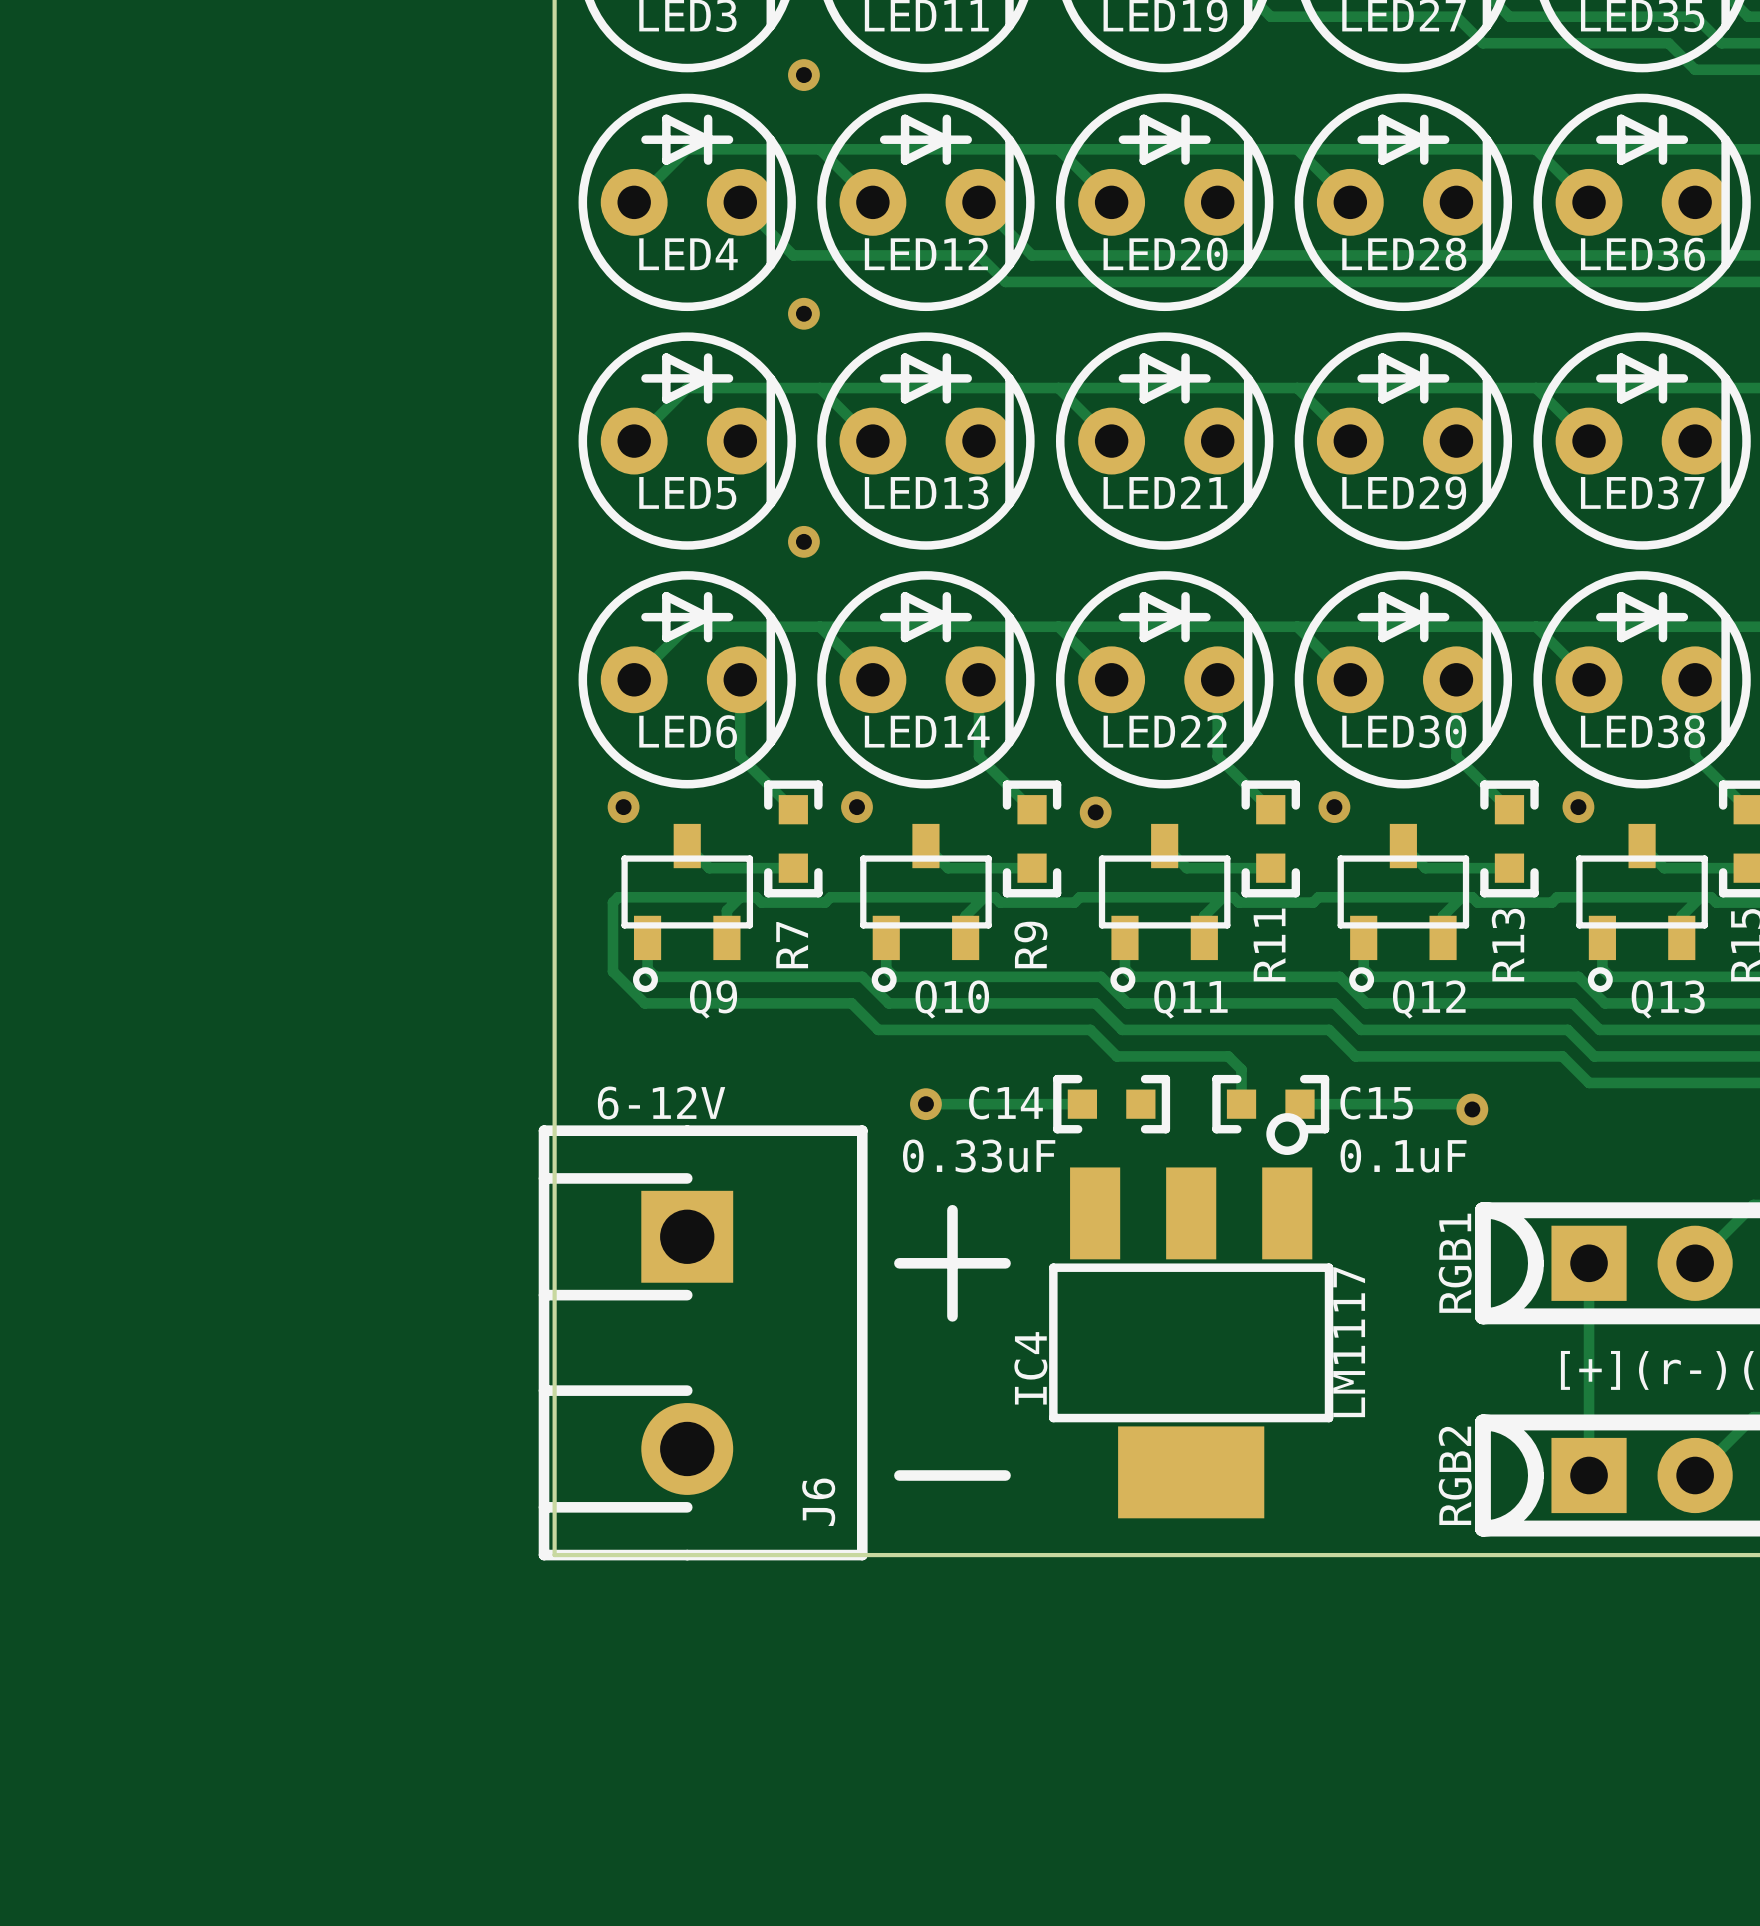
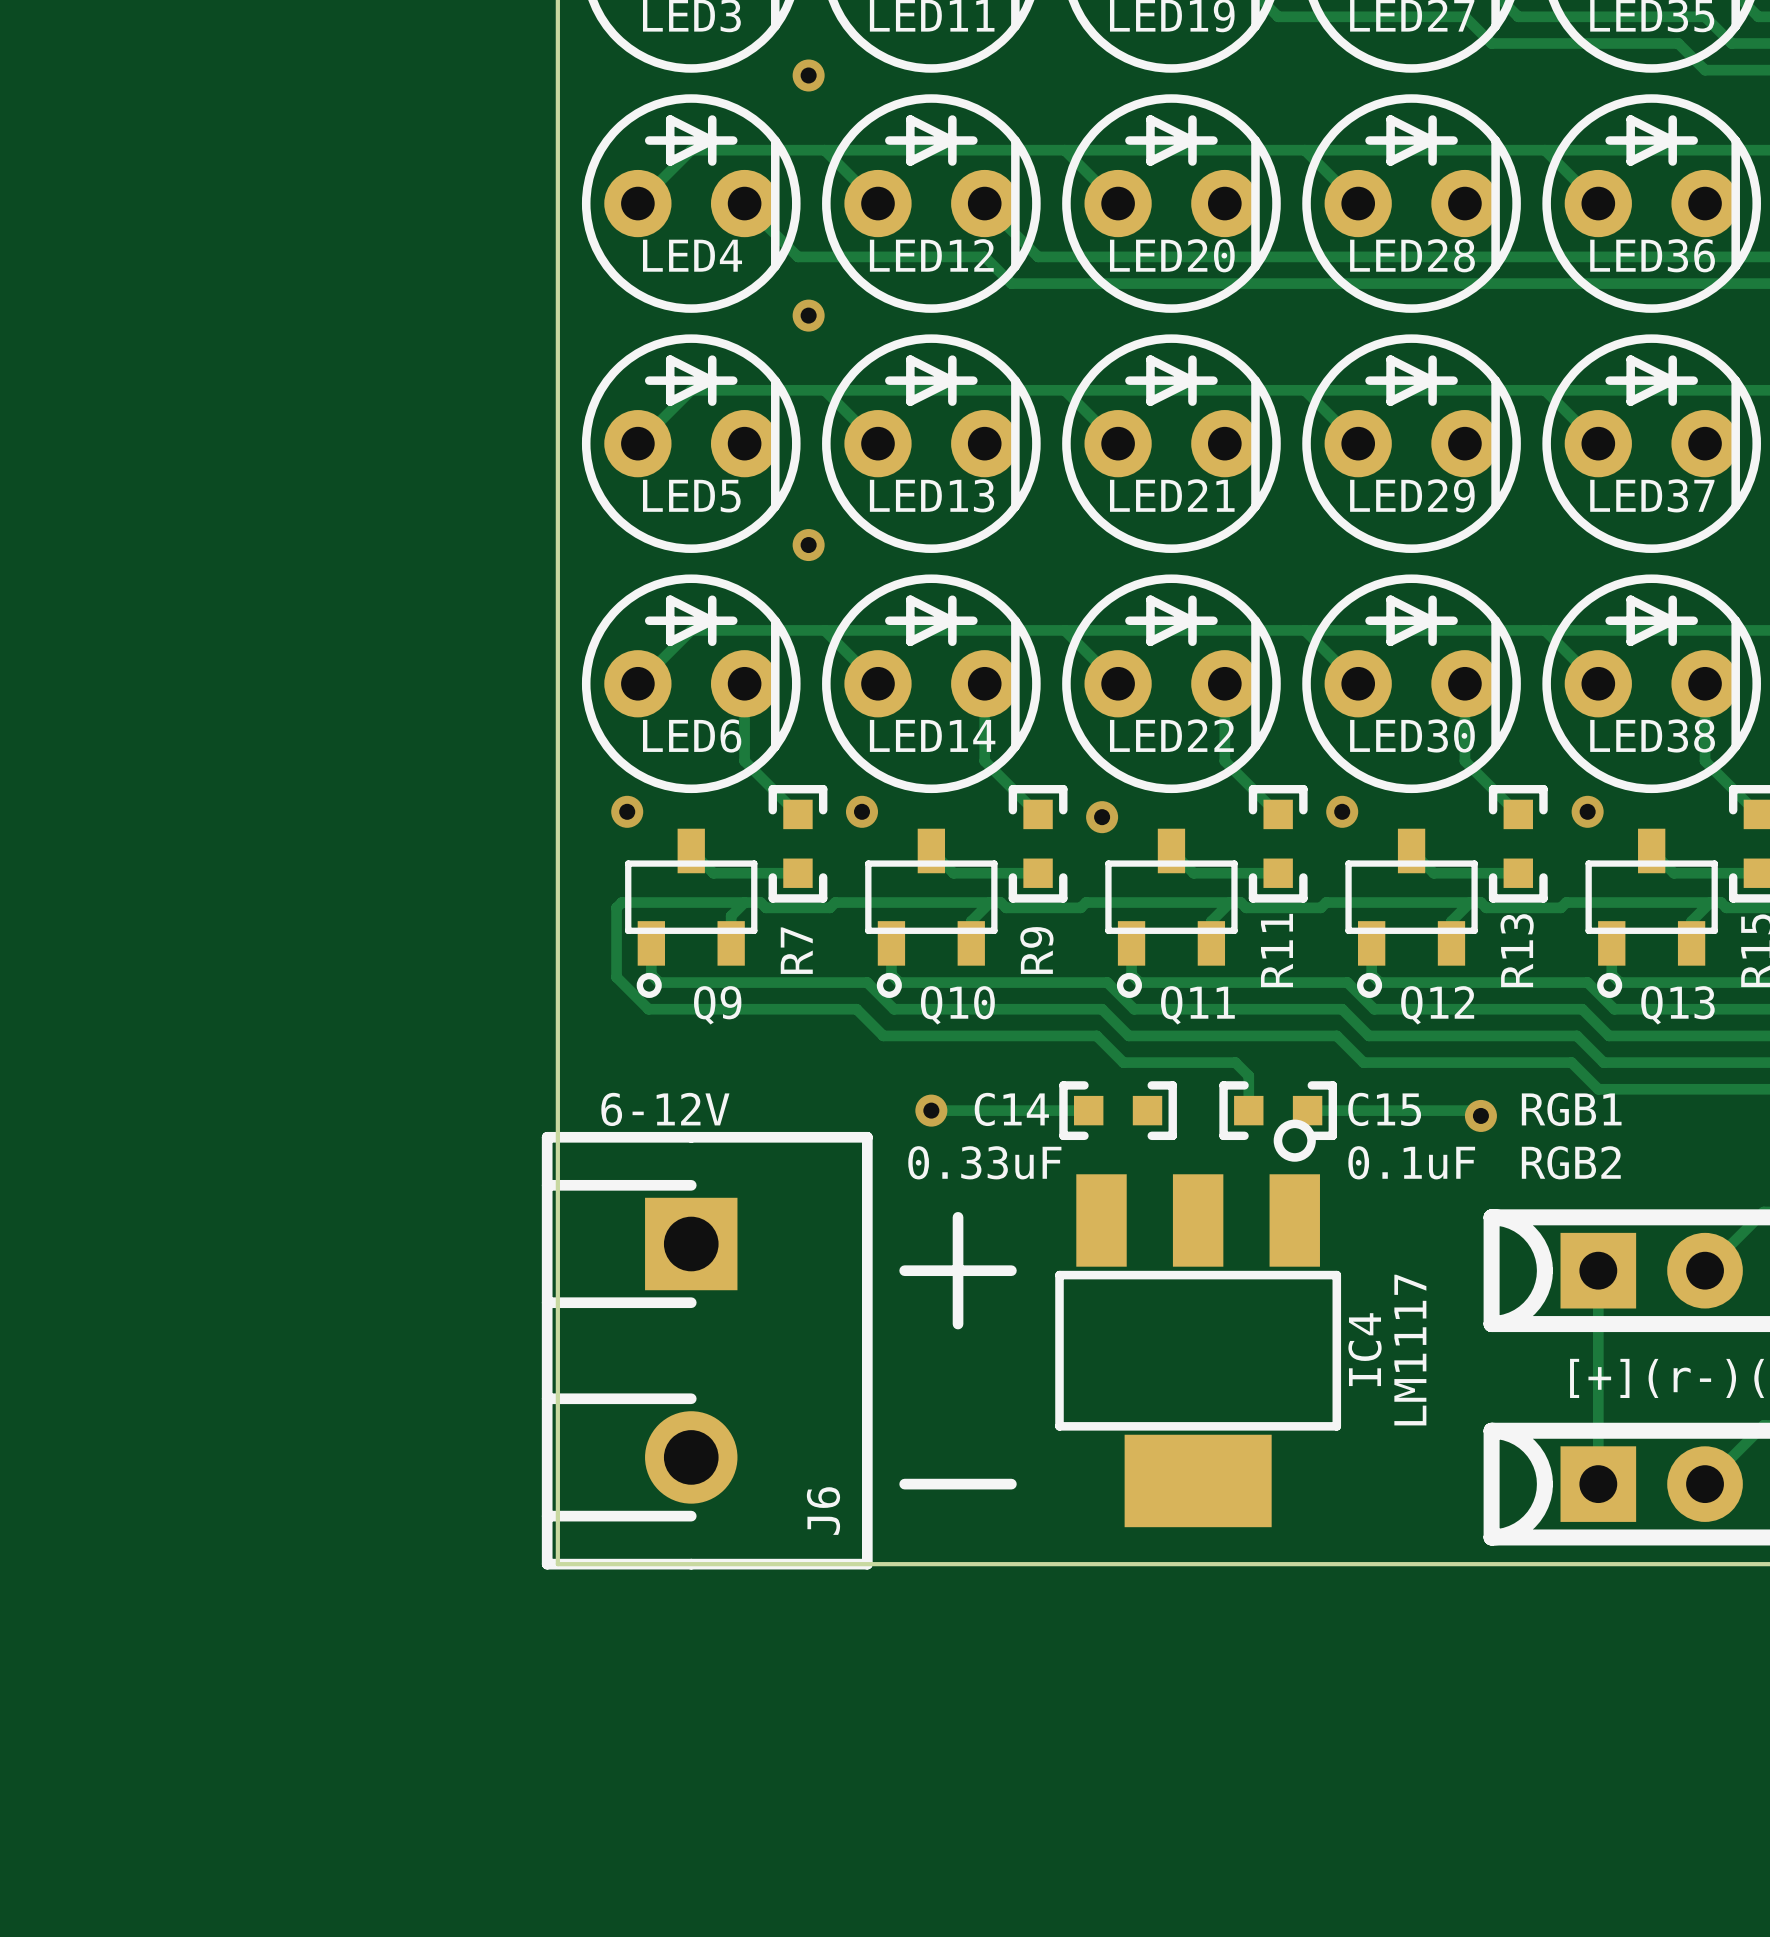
part value rotation: 0° (1455, 1263) -> 90° clockwise (1571, 1109)
part value position: RGB1 (1455, 1263) -> RGB1 (1571, 1109)
IC4 value position: LM1117 (1349, 1342) -> LM1117 (1410, 1350)
IC4 name position: IC4 (1030, 1368) -> IC4 (1365, 1349)
part value rotation: 0° (1455, 1475) -> 90° clockwise (1571, 1162)
part value position: RGB2 (1455, 1475) -> RGB2 (1571, 1162)

